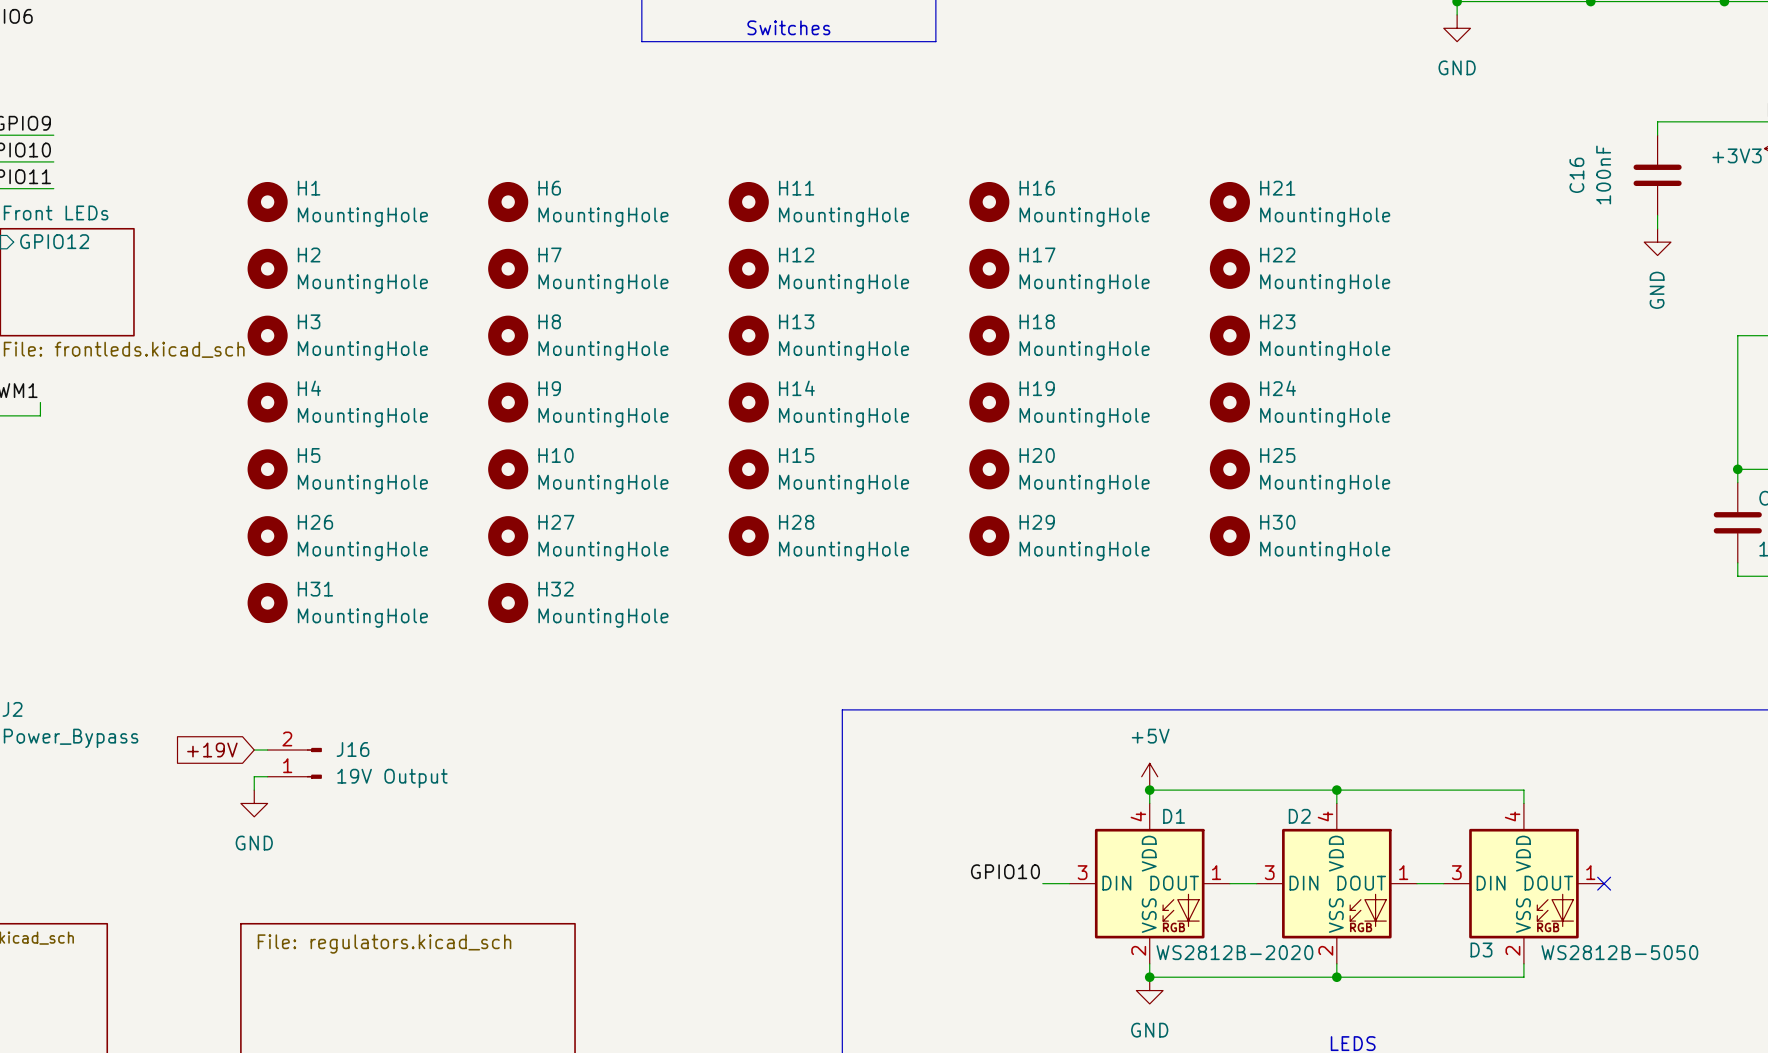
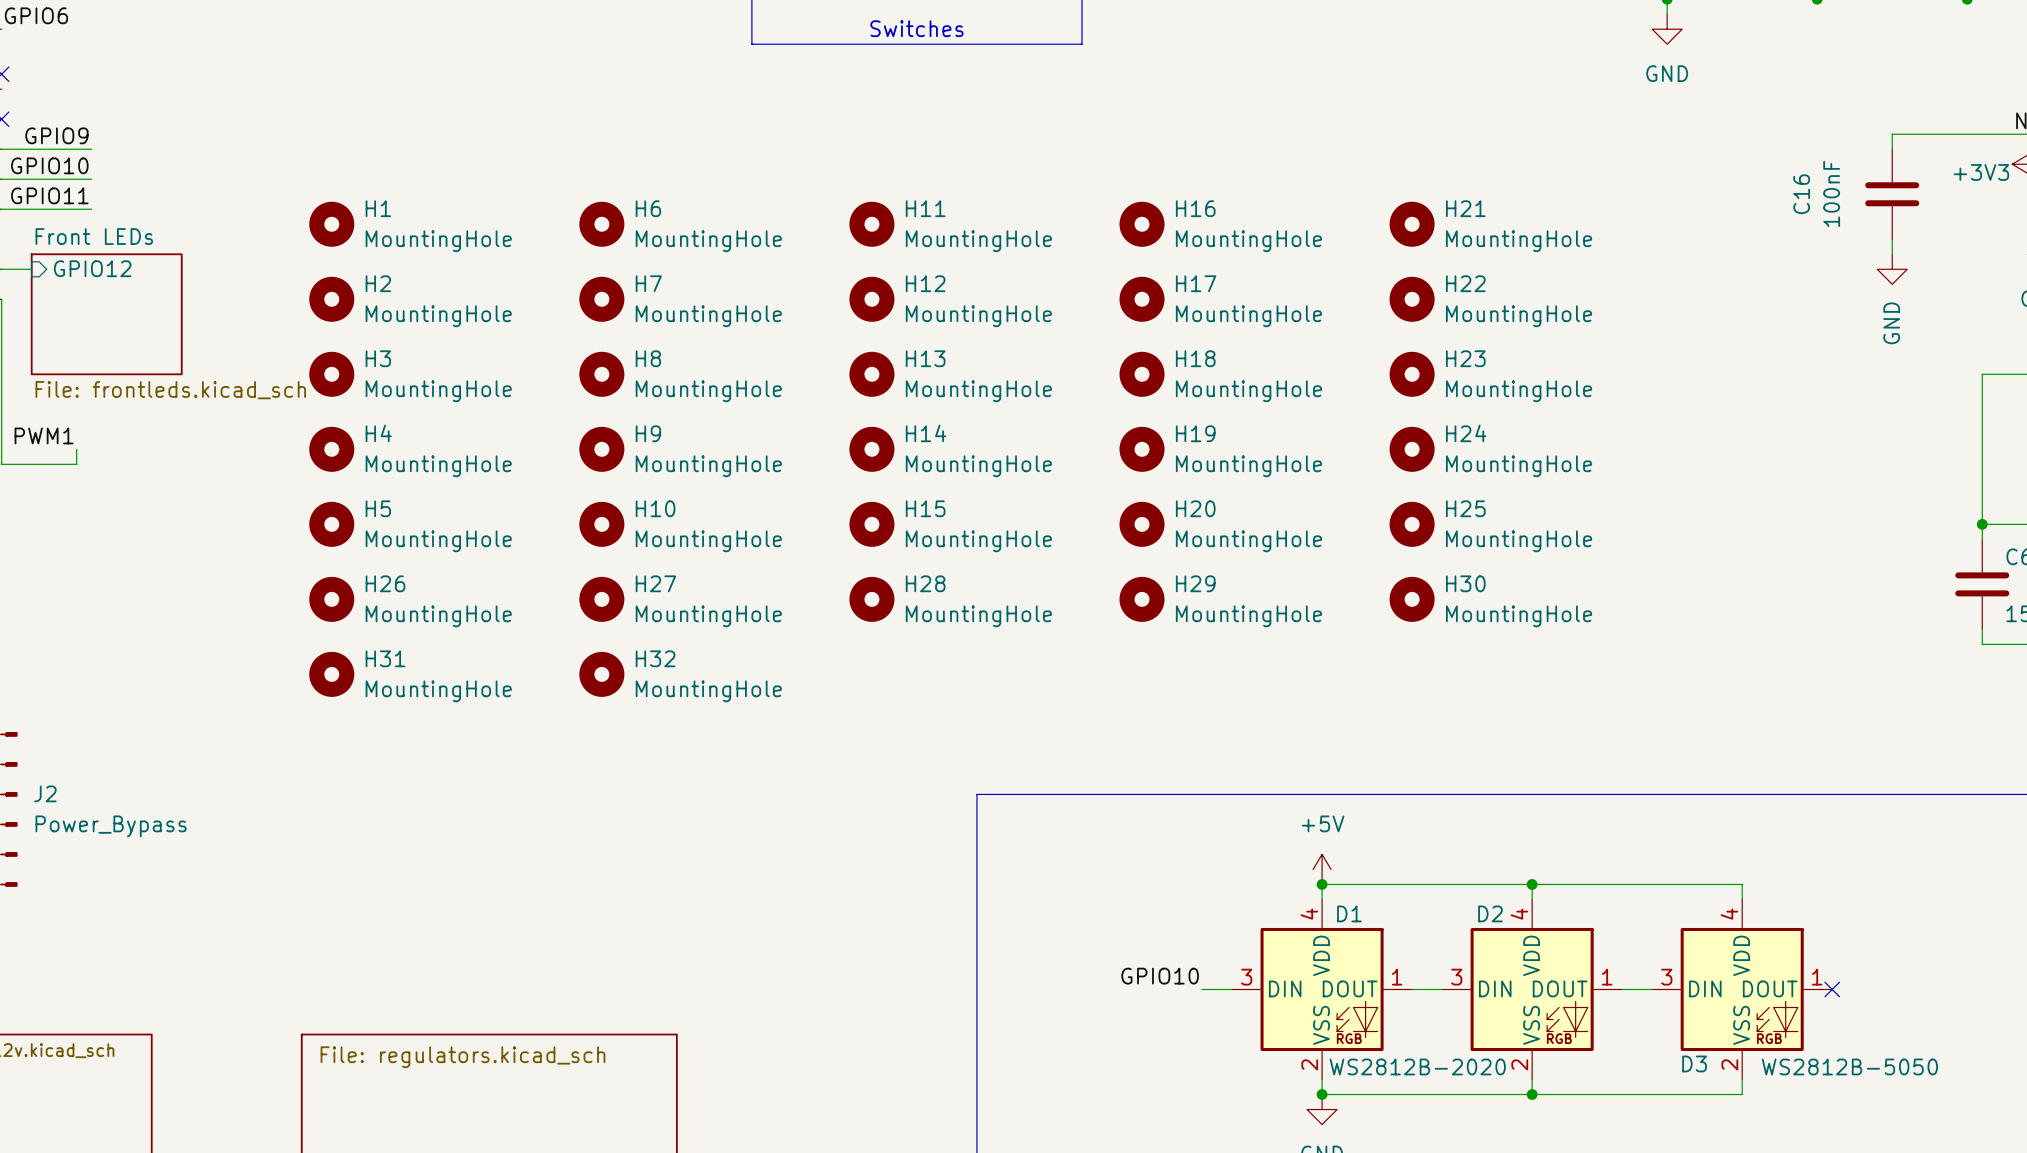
global label: +19V (212, 750) -> none
wire: (254, 750) (267, 750) -> none
J16: 19V Output (294, 763) -> none
wire: (267, 776) (254, 776) (254, 790) -> none
power symbol: GND (254, 803) -> none

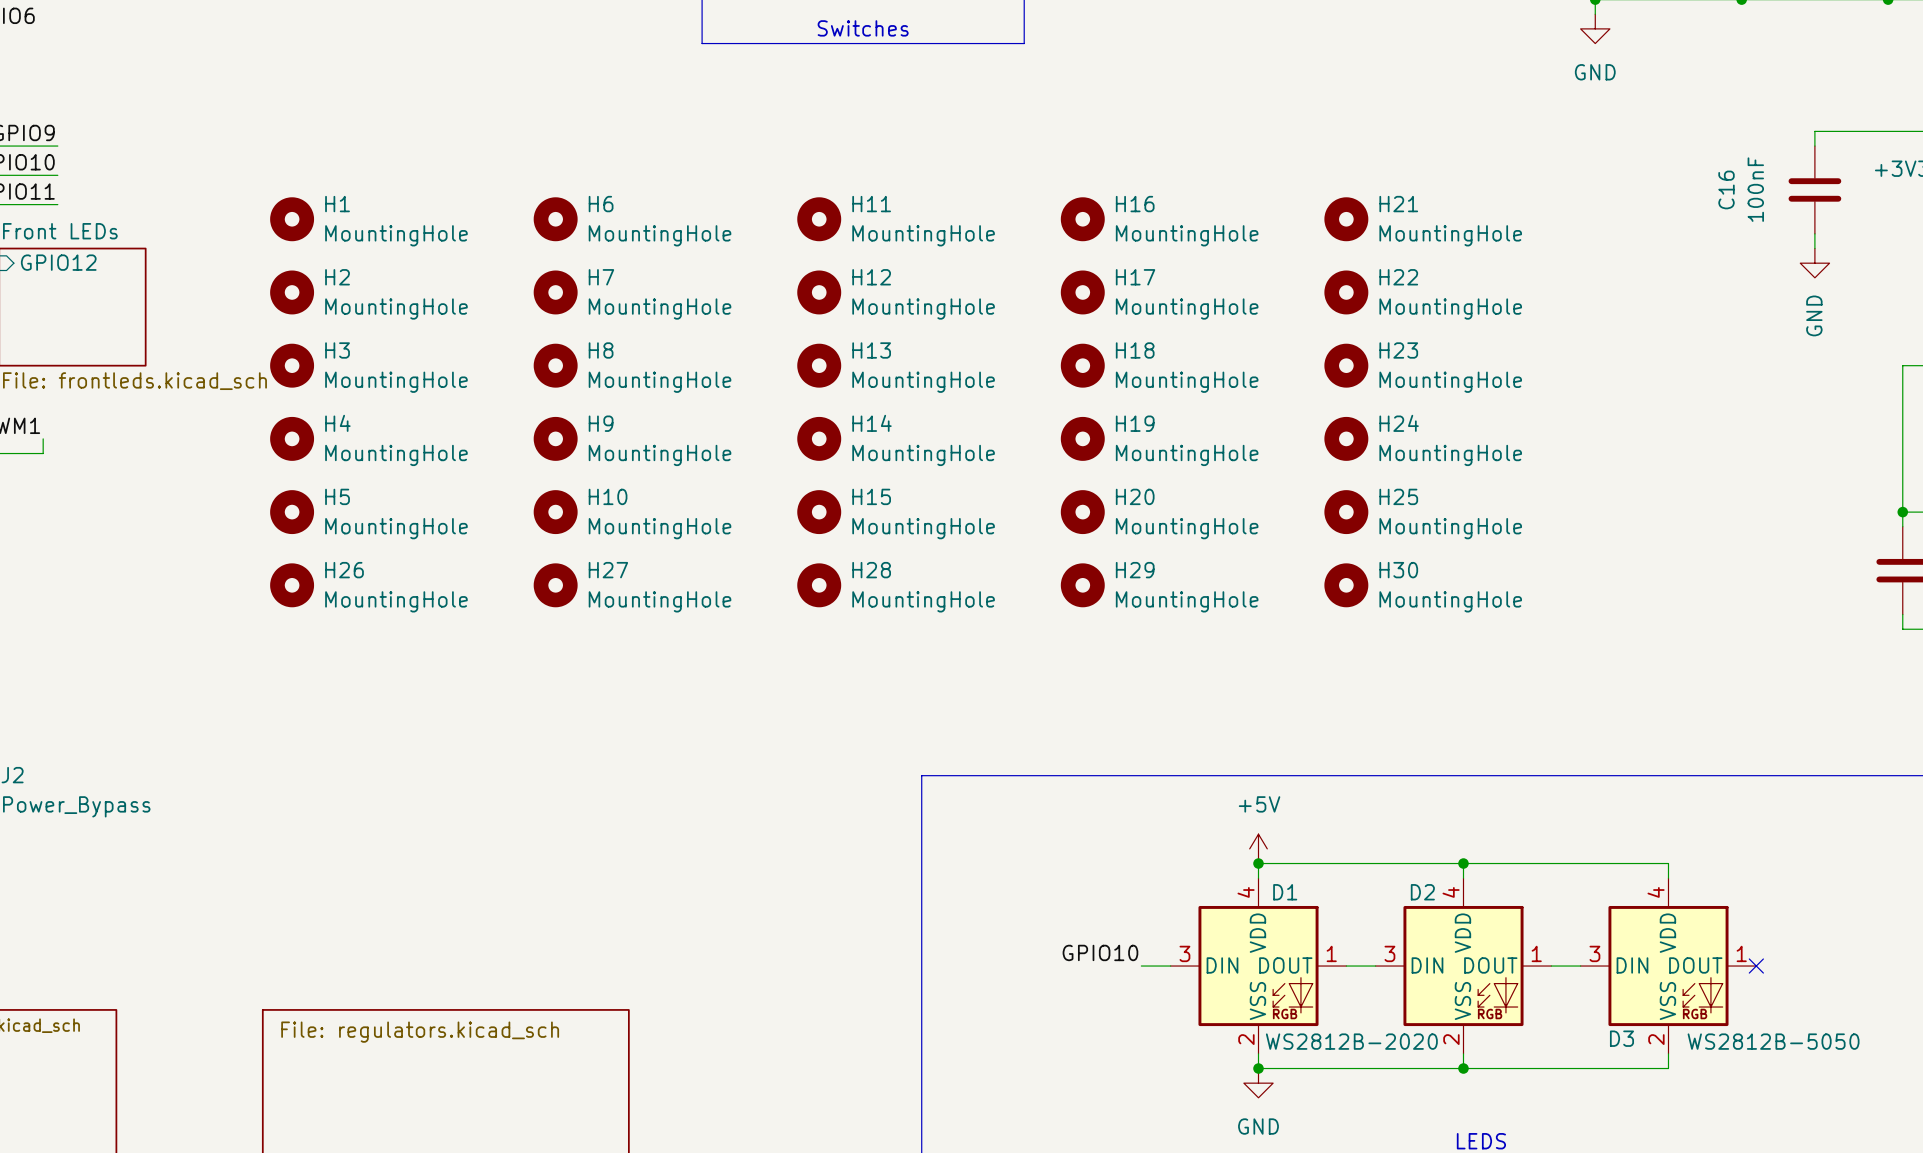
H31: MountingHole (331, 674) -> none
H32: MountingHole (601, 674) -> none

